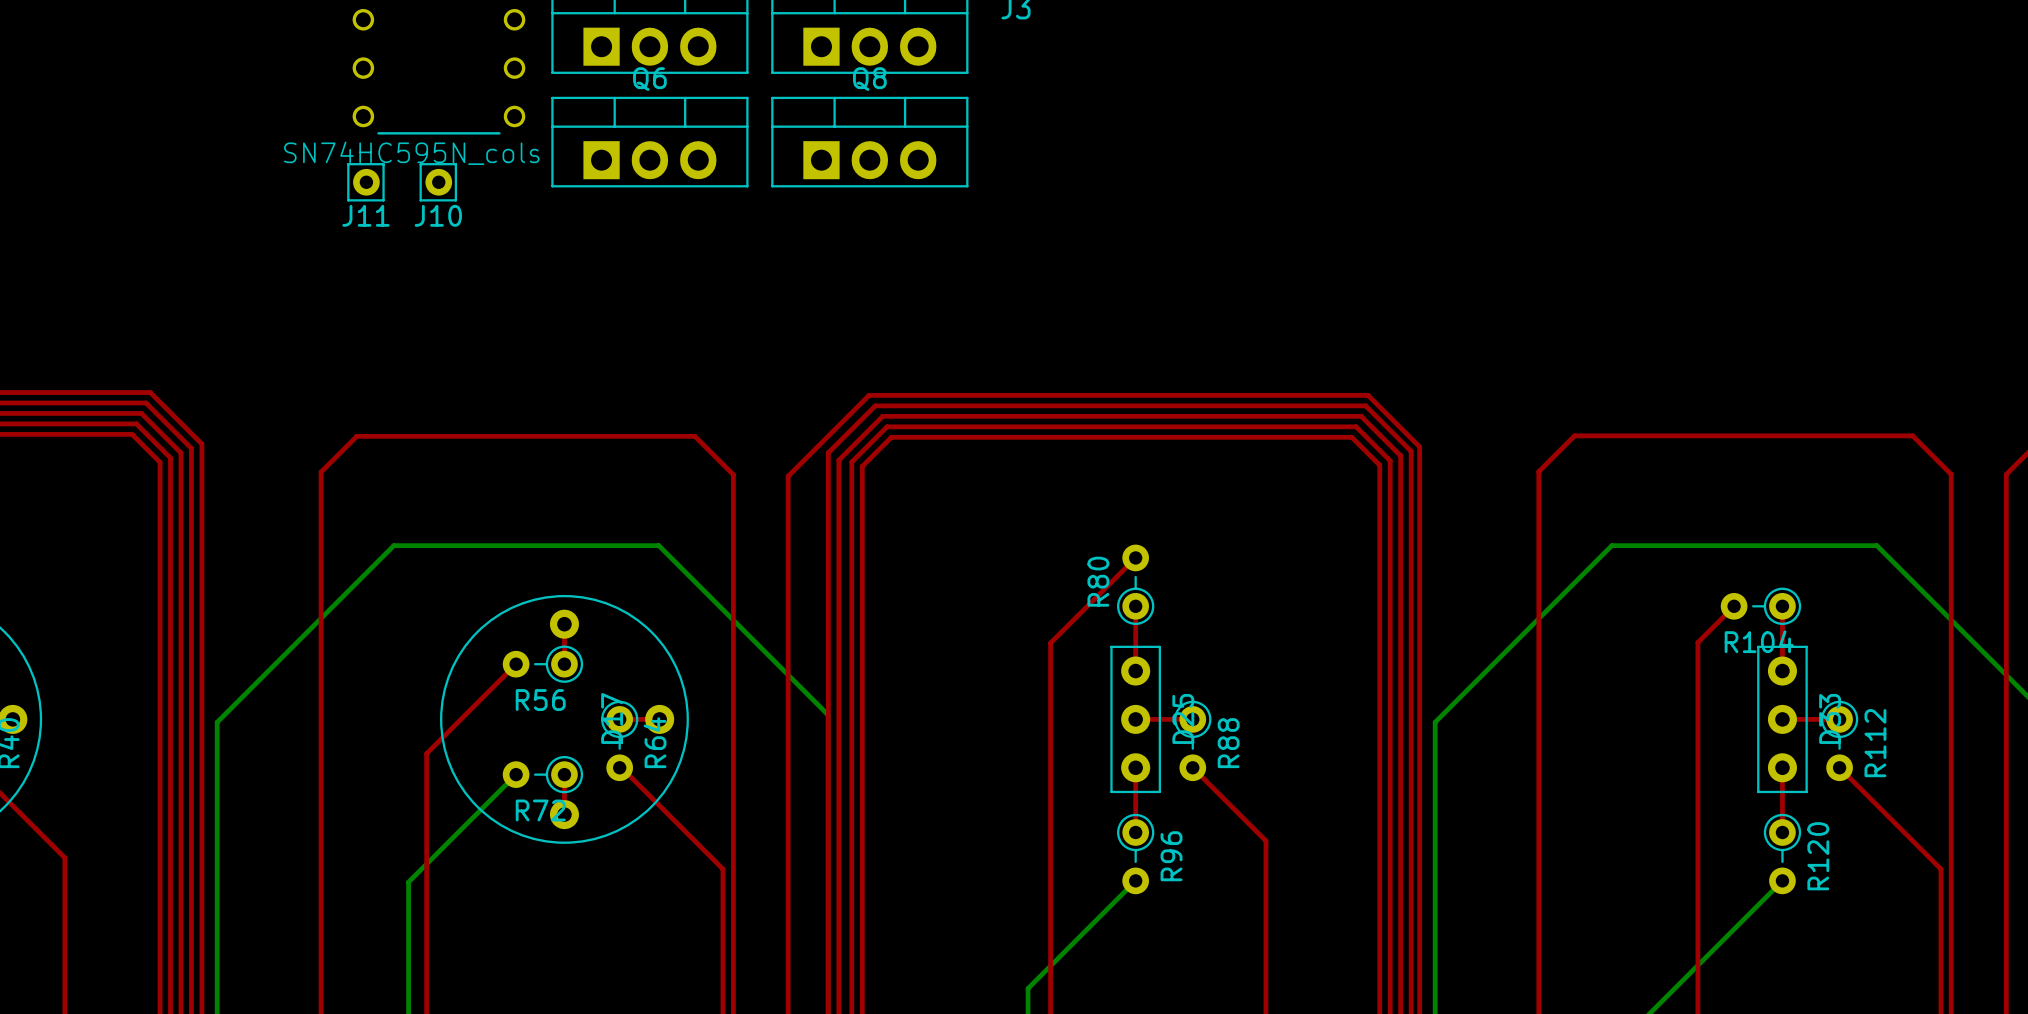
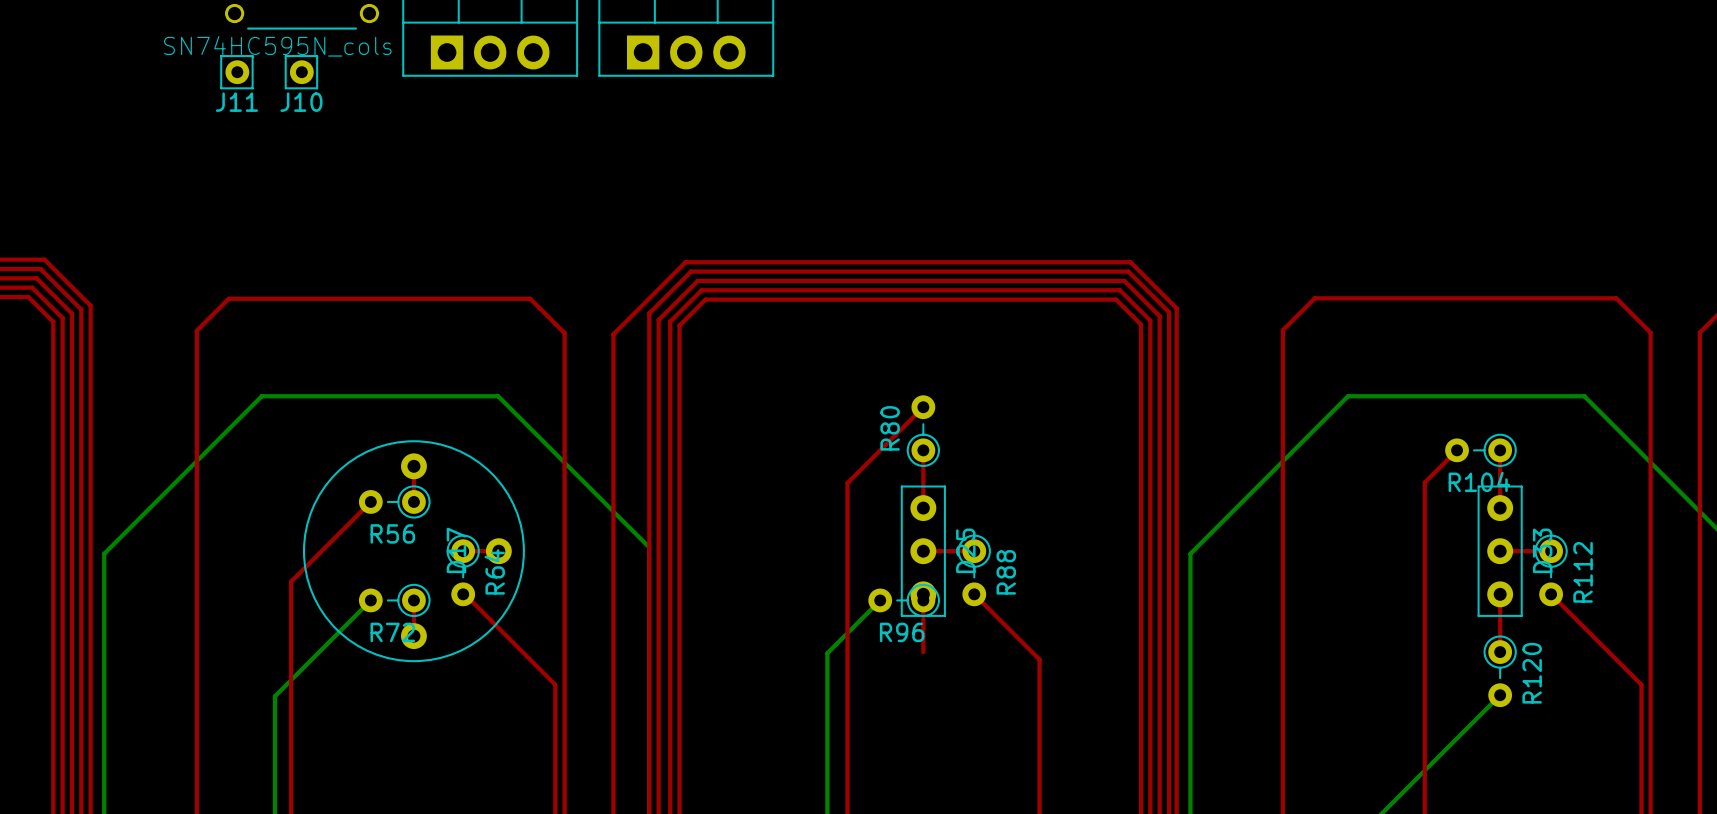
R96 rotation: 0° (1135, 854) -> 90° clockwise (904, 600)
R96 position: (1135, 854) -> (904, 600)
bottom track: (1135, 880) (1028, 988) -> (880, 600) (827, 653) (827, 791)

